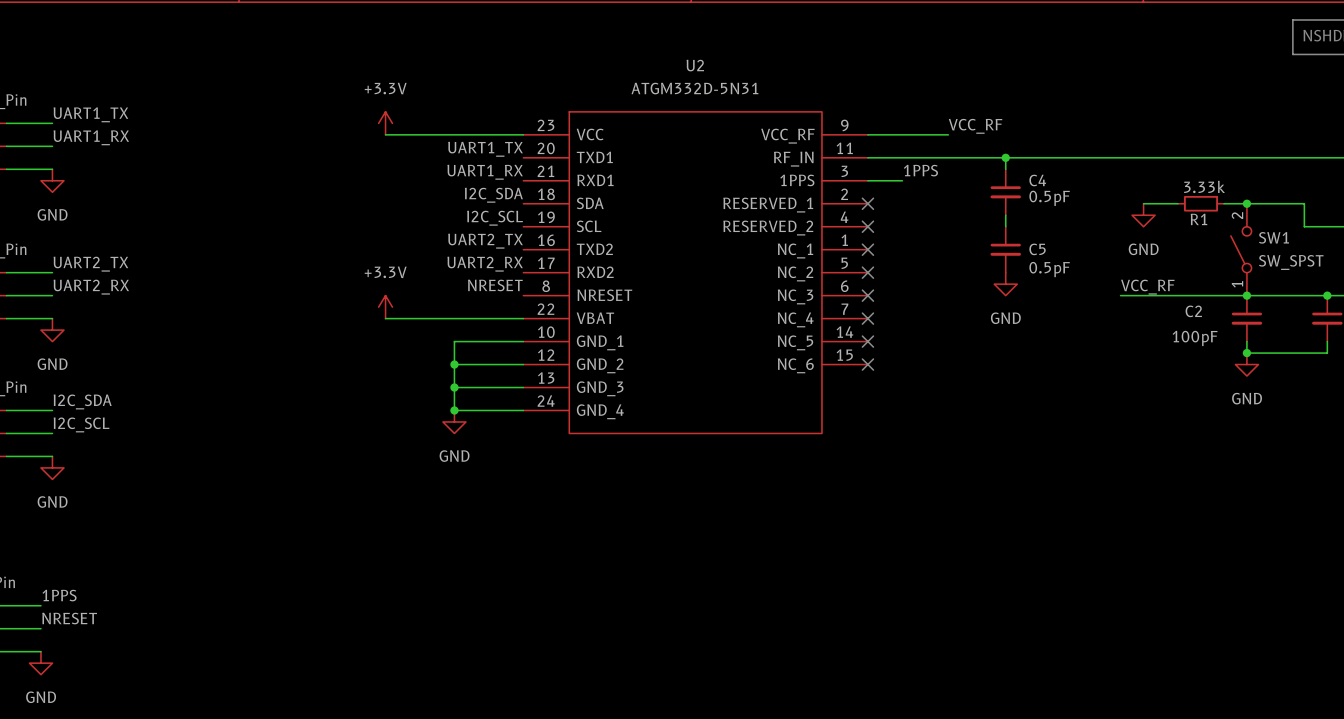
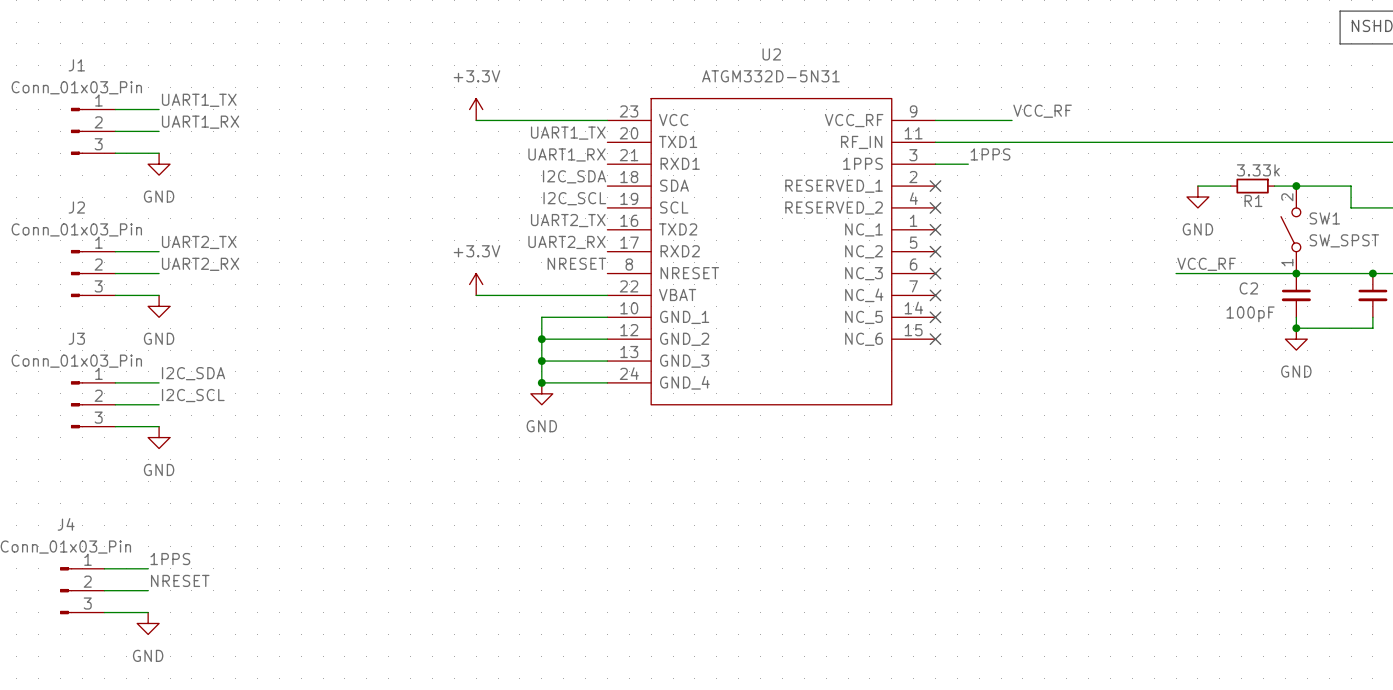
wire: (1005, 157) (1005, 169) -> none
junction: (1005, 157) -> none
C4: 0.5pF (1005, 192) -> none
wire: (1005, 215) (1005, 226) -> none
C5: 0.5pF (1005, 249) -> none
power symbol: GND (1005, 284) -> none

